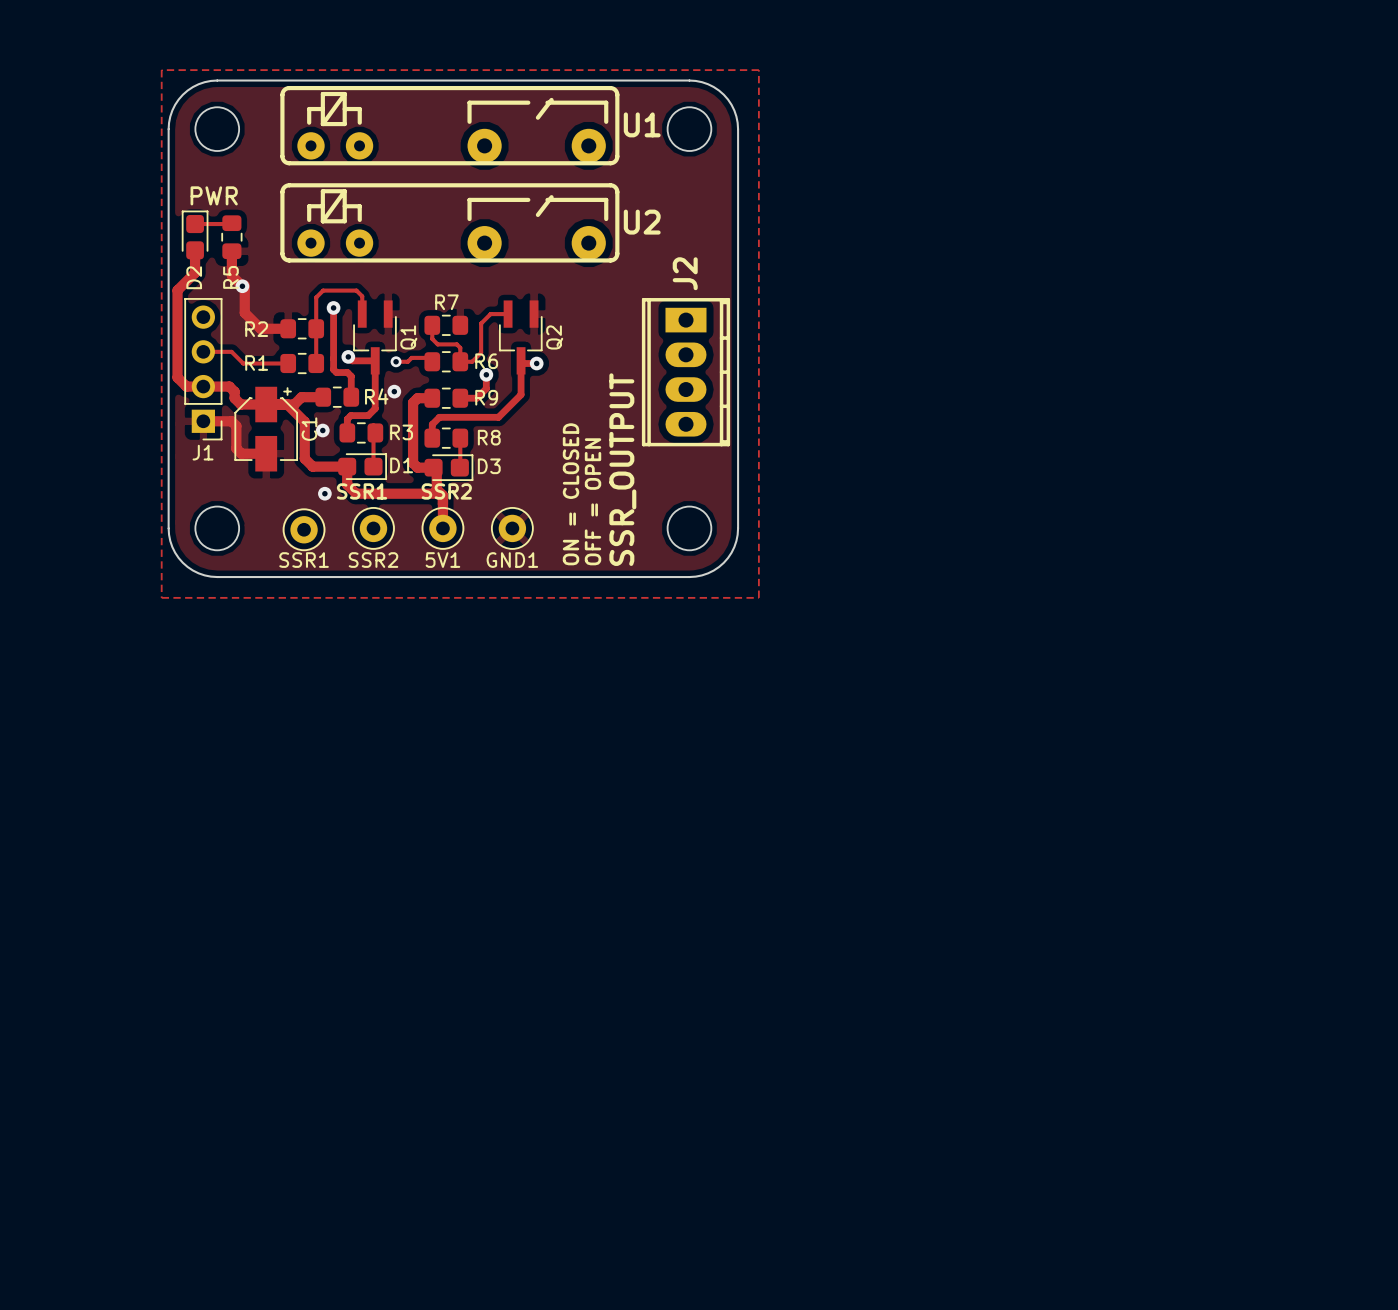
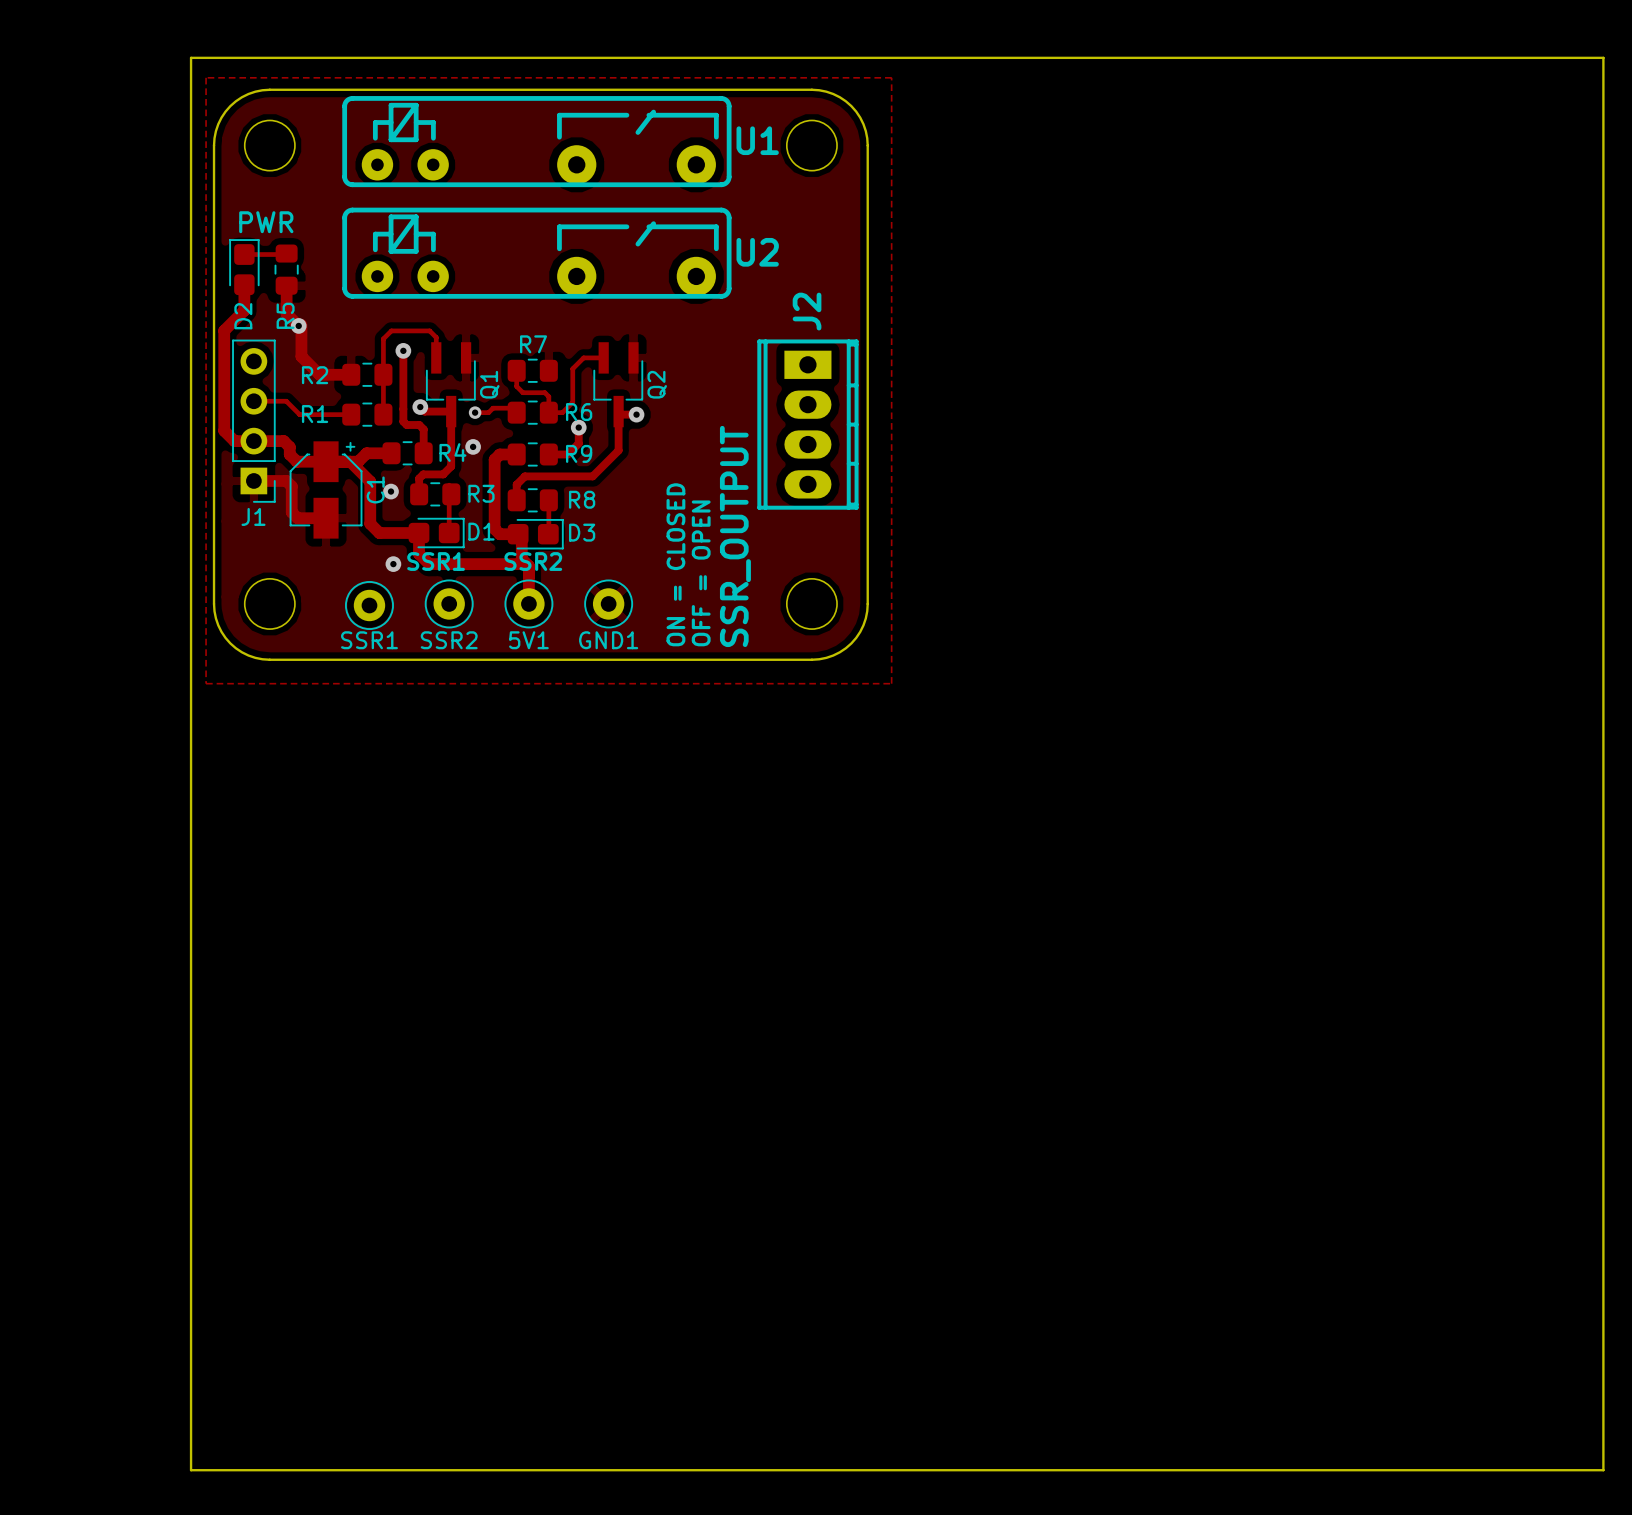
board edge: none -> (191, 57) (191, 1470) (1603, 1470) (1603, 57) (191, 57)

